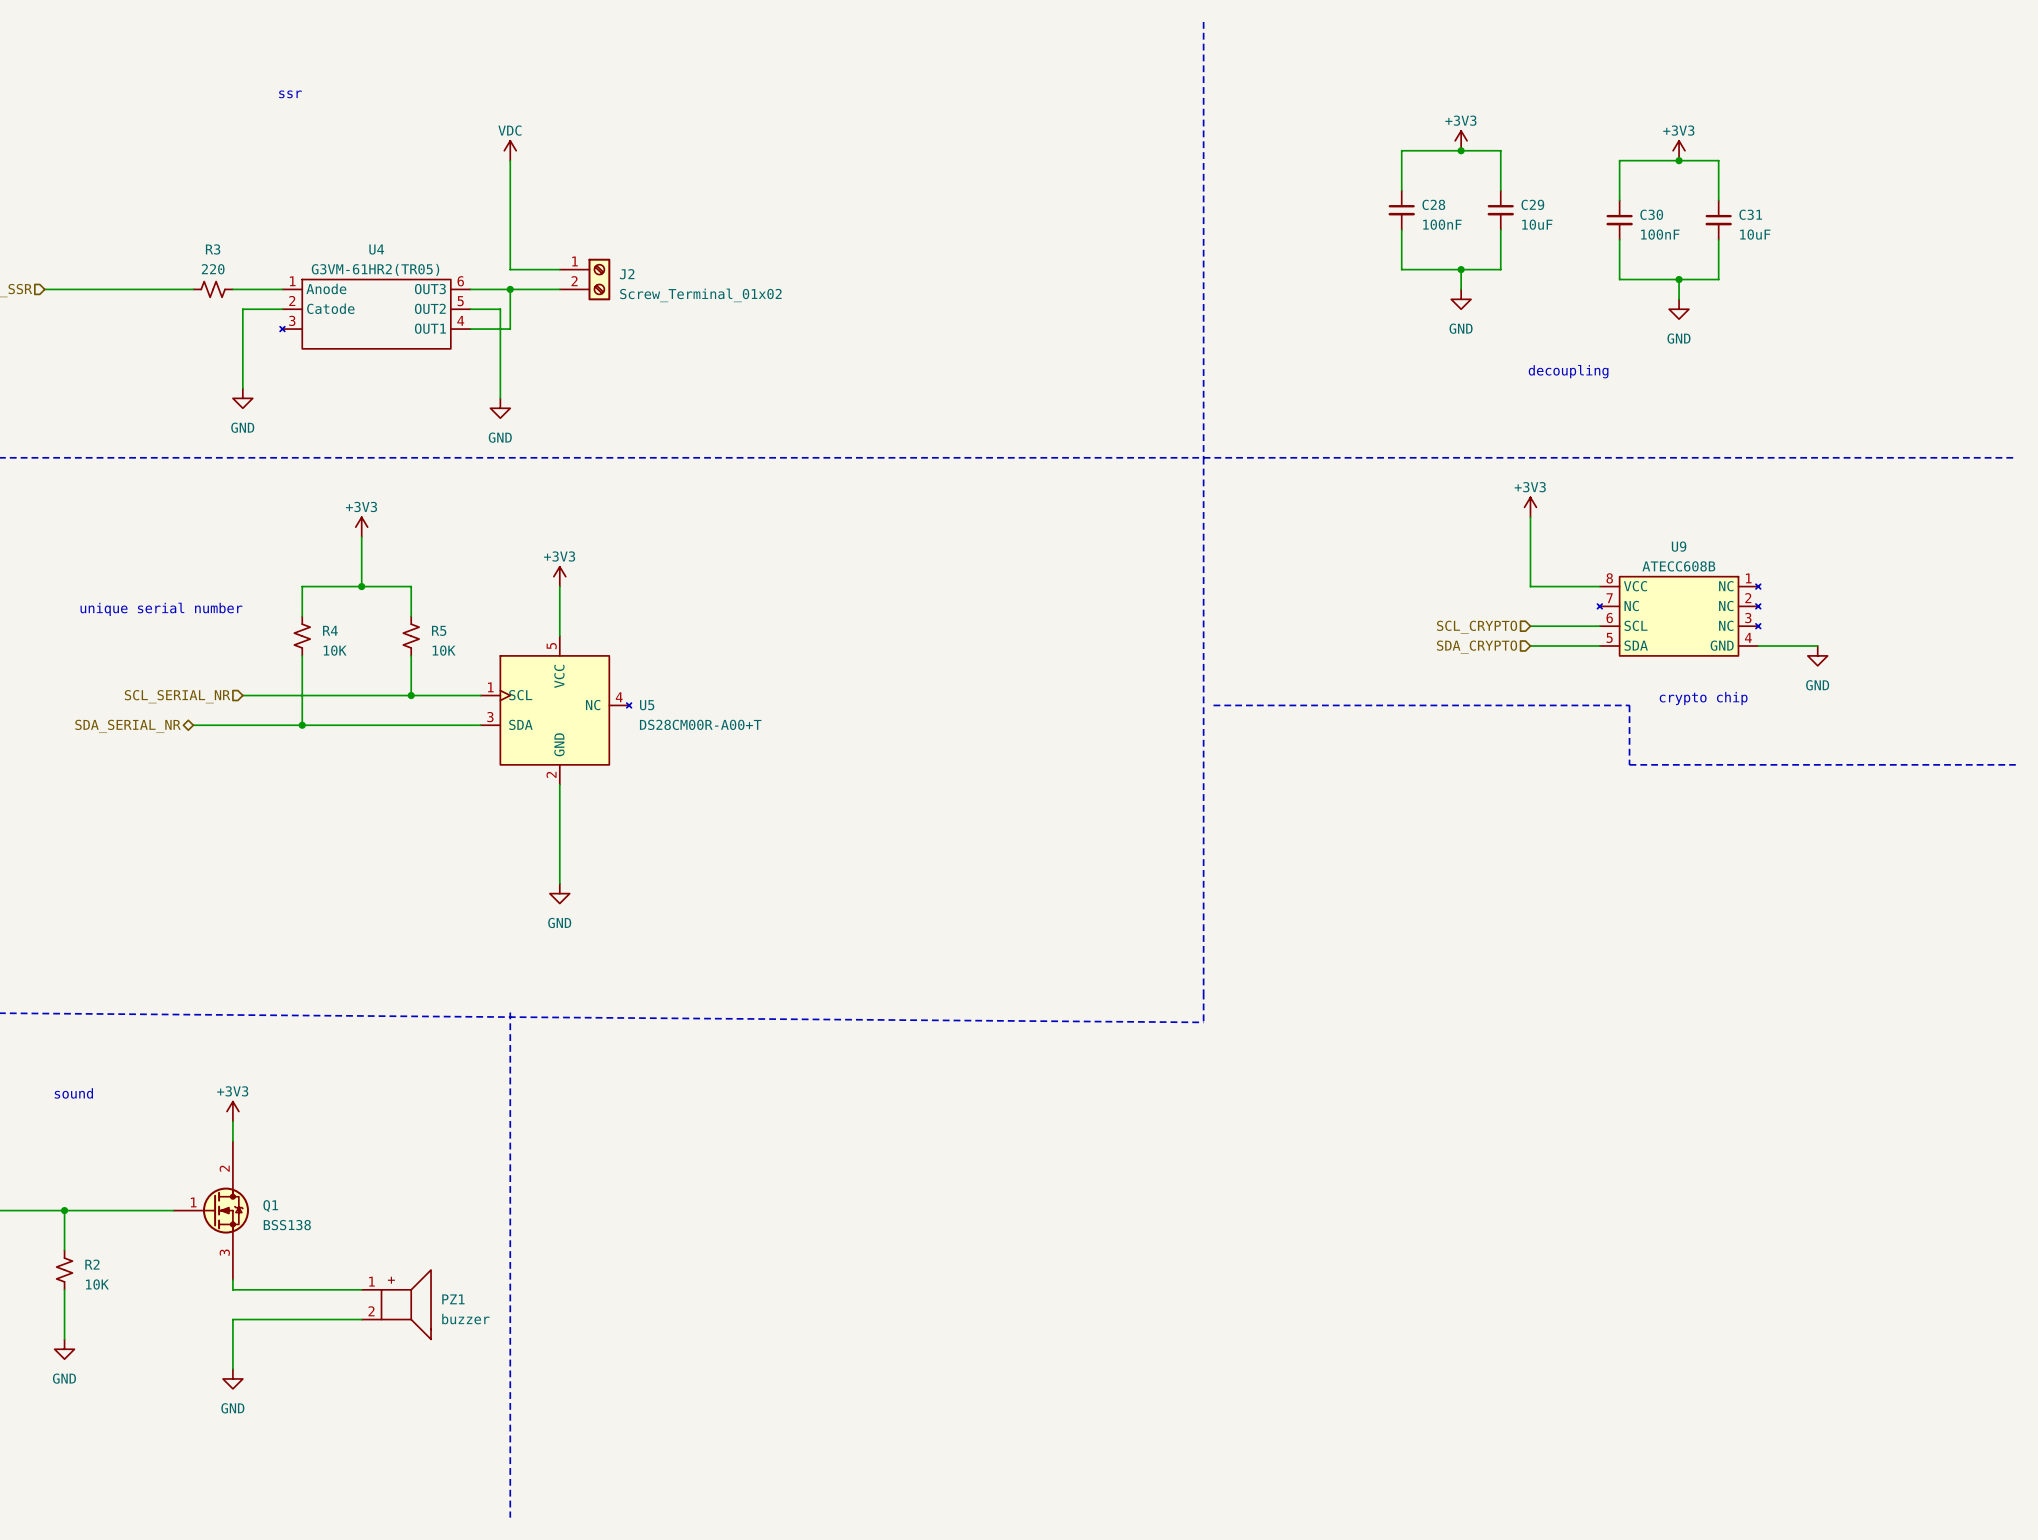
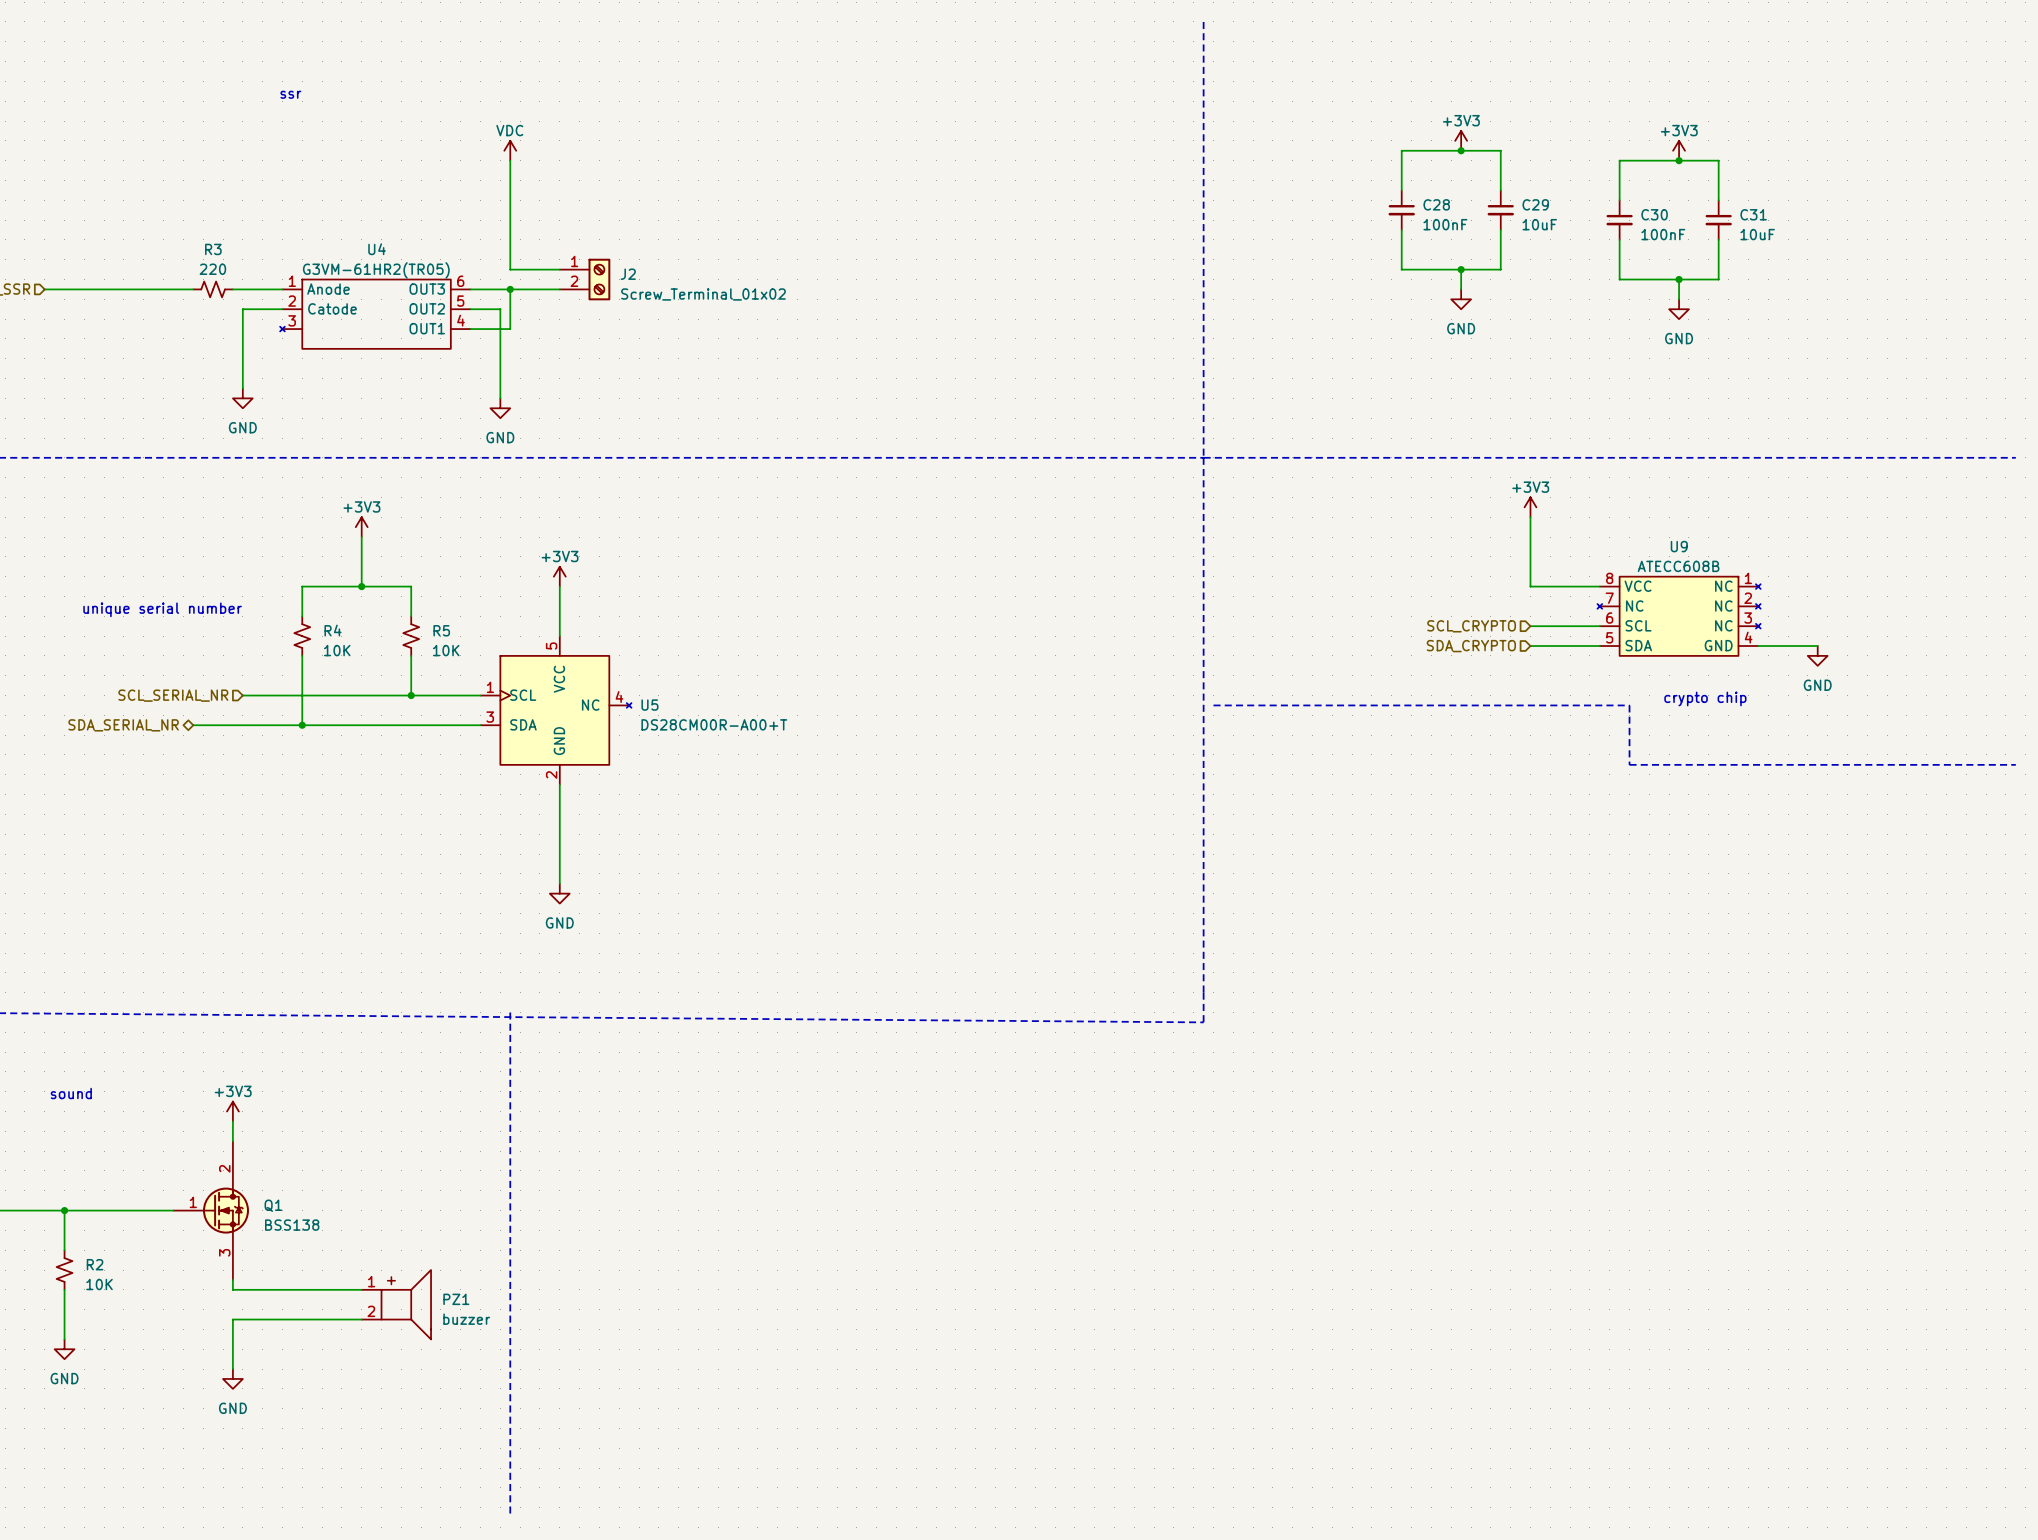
text: decoupling (1568, 371) -> none

